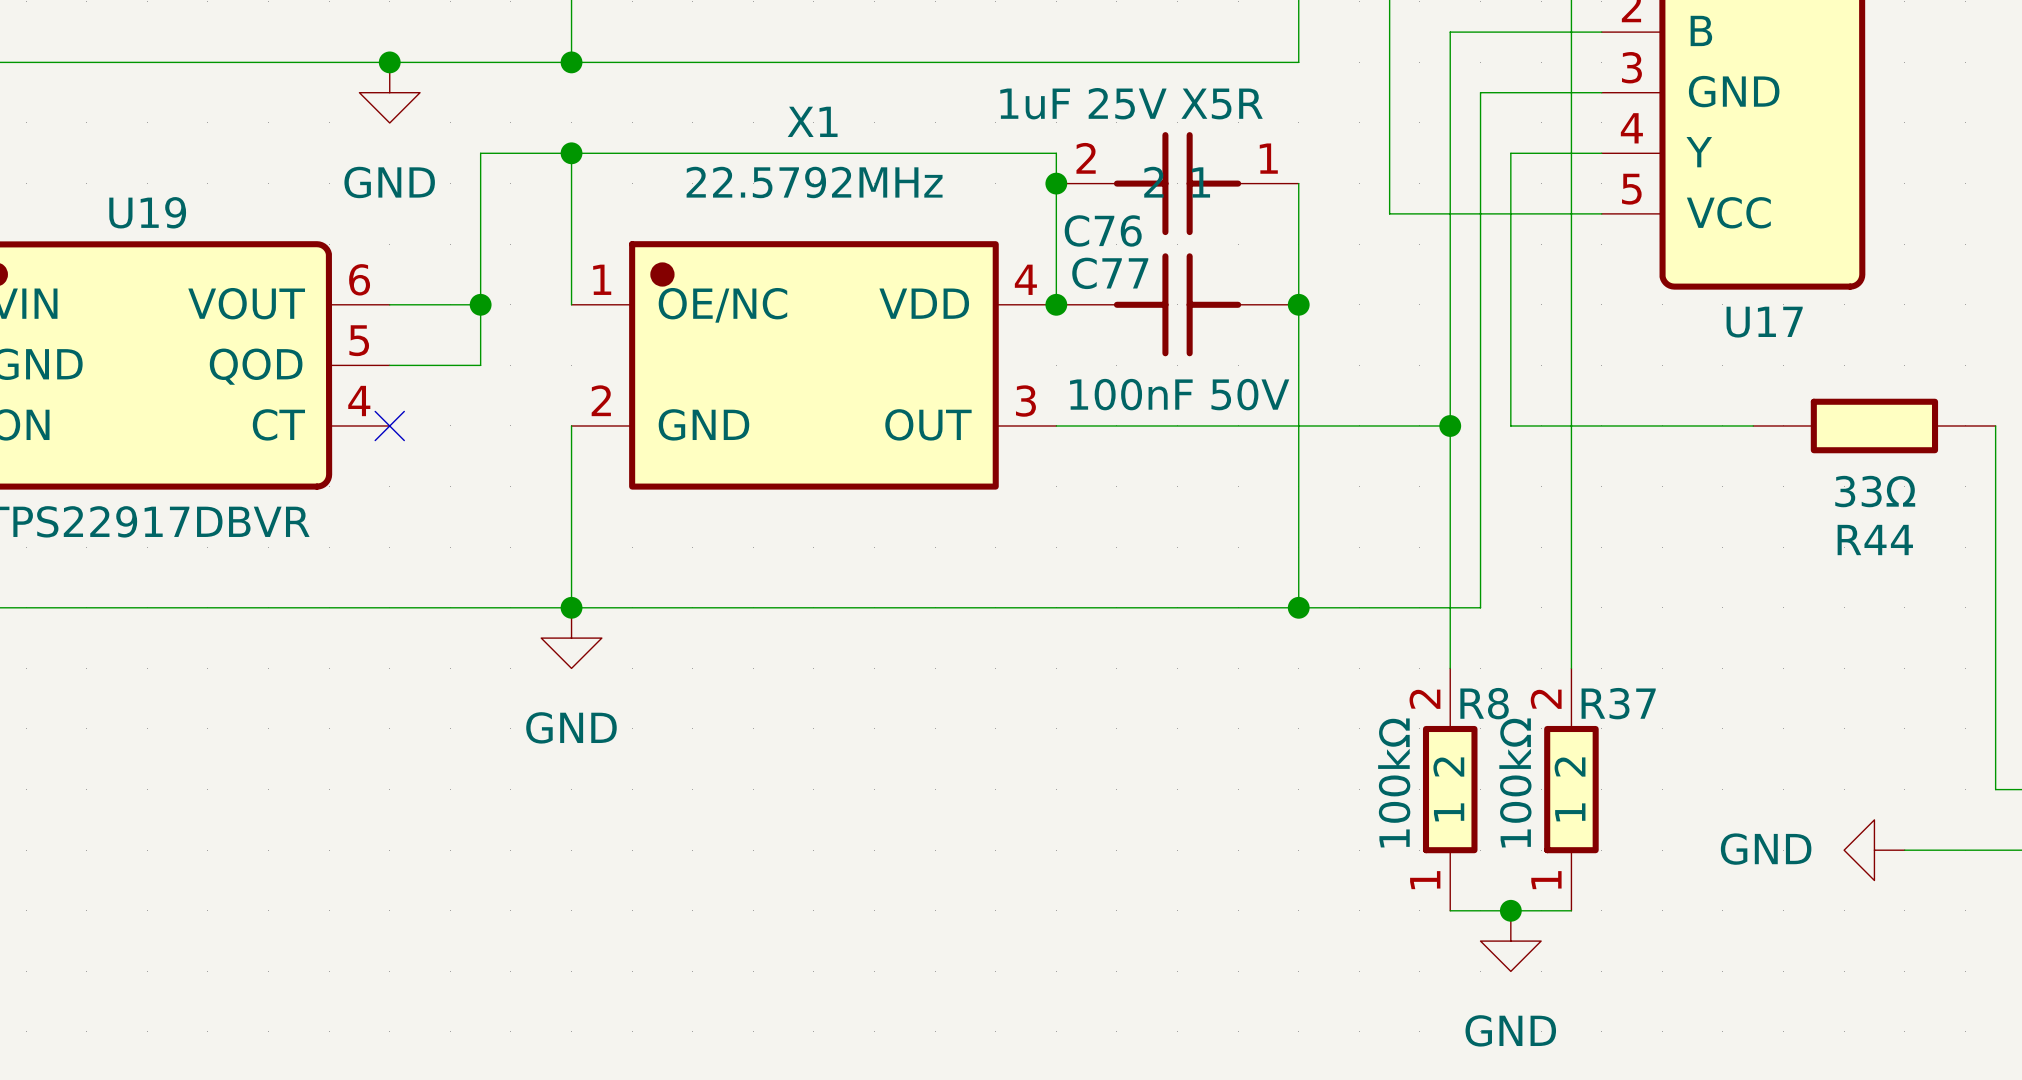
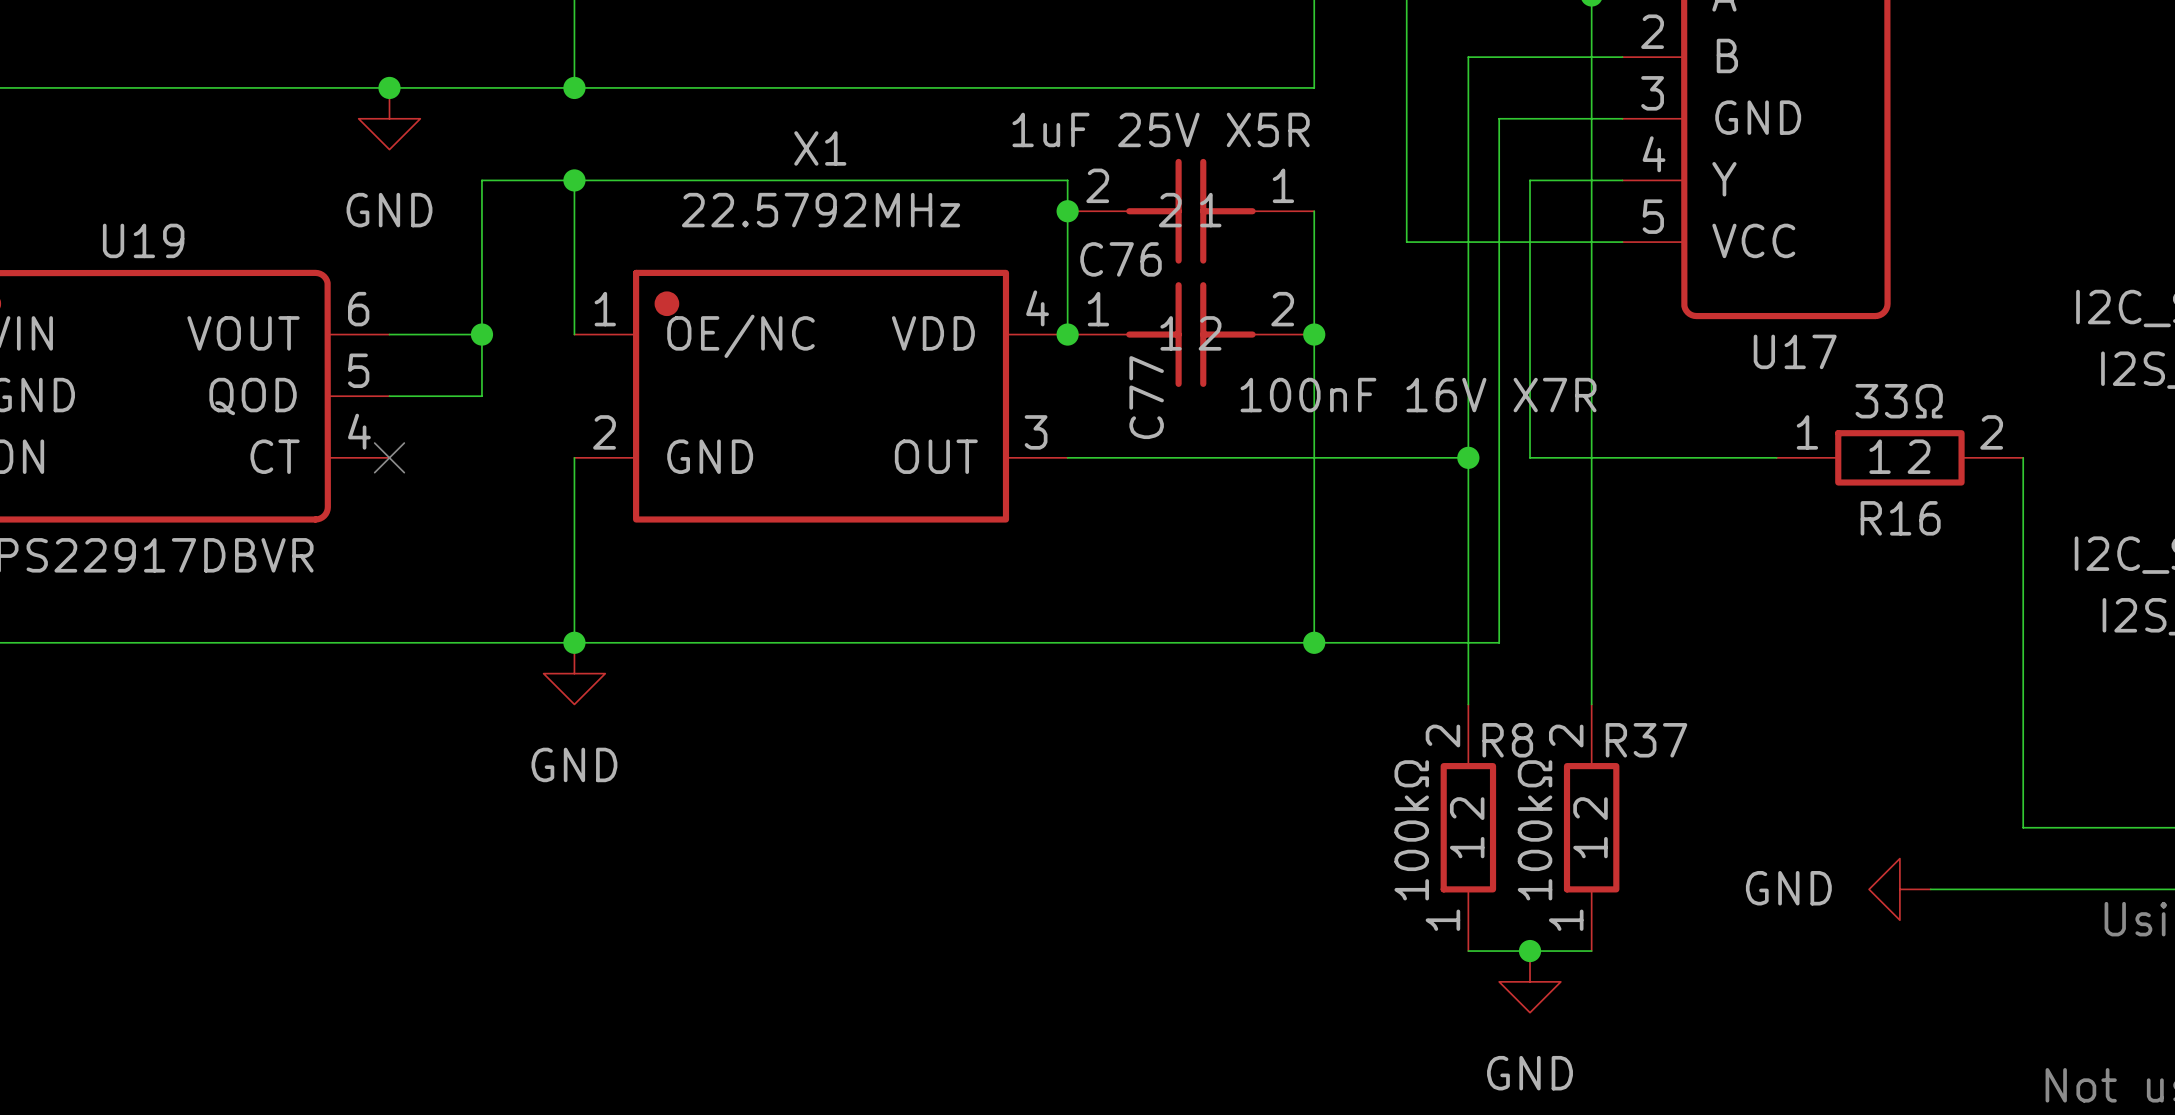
C77 name rotation: 0° (1110, 273) -> 90° counterclockwise (1146, 397)
C77 pin number: none -> 1 (1098, 309)
C77 pin number: none -> 2 (1282, 309)
C77 pin name: none -> 1 (1171, 333)
C77 pin name: none -> 2 (1210, 333)
C77 value: 100nF 50V (1179, 394) -> 100nF 16V X7R (1418, 395)
R44 pin number: none -> 2 (1991, 432)
R44 pin number: none -> 1 (1807, 432)
R44 pin name: none -> 1 (1880, 456)
R44 pin name: none -> 2 (1919, 456)
R44 value position: 33Ω (1875, 491) -> 33Ω (1899, 401)
R44 name: R44 (1875, 540) -> R16 (1900, 518)

